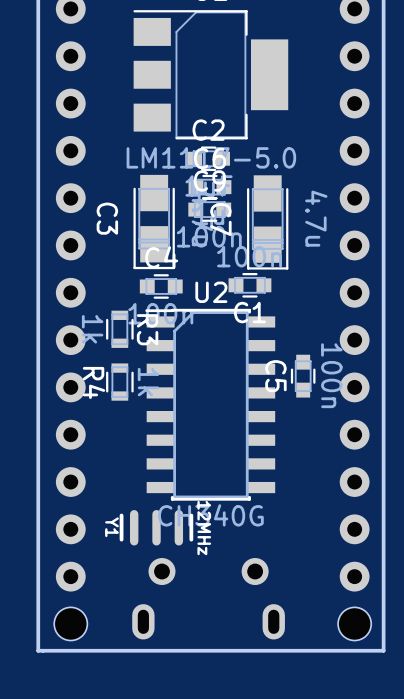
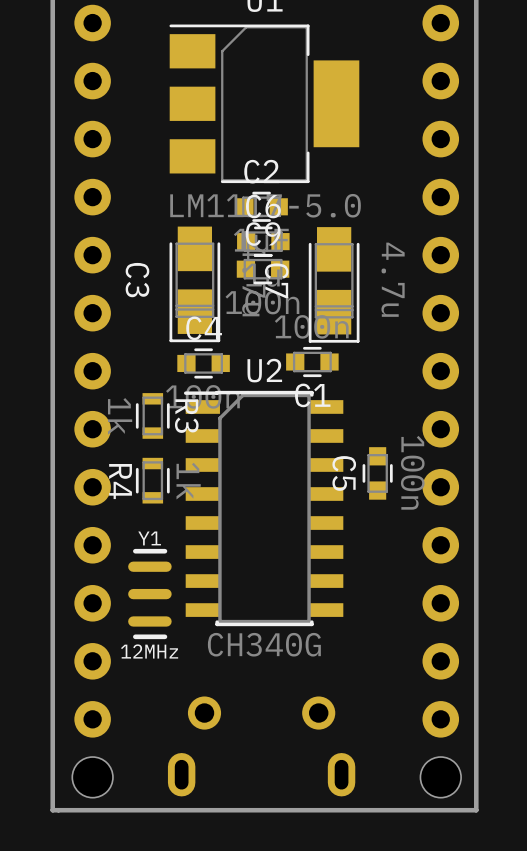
Y1 rotation: 0° (156, 527) -> 90° clockwise (149, 594)
Y1 position: (156, 527) -> (149, 594)

